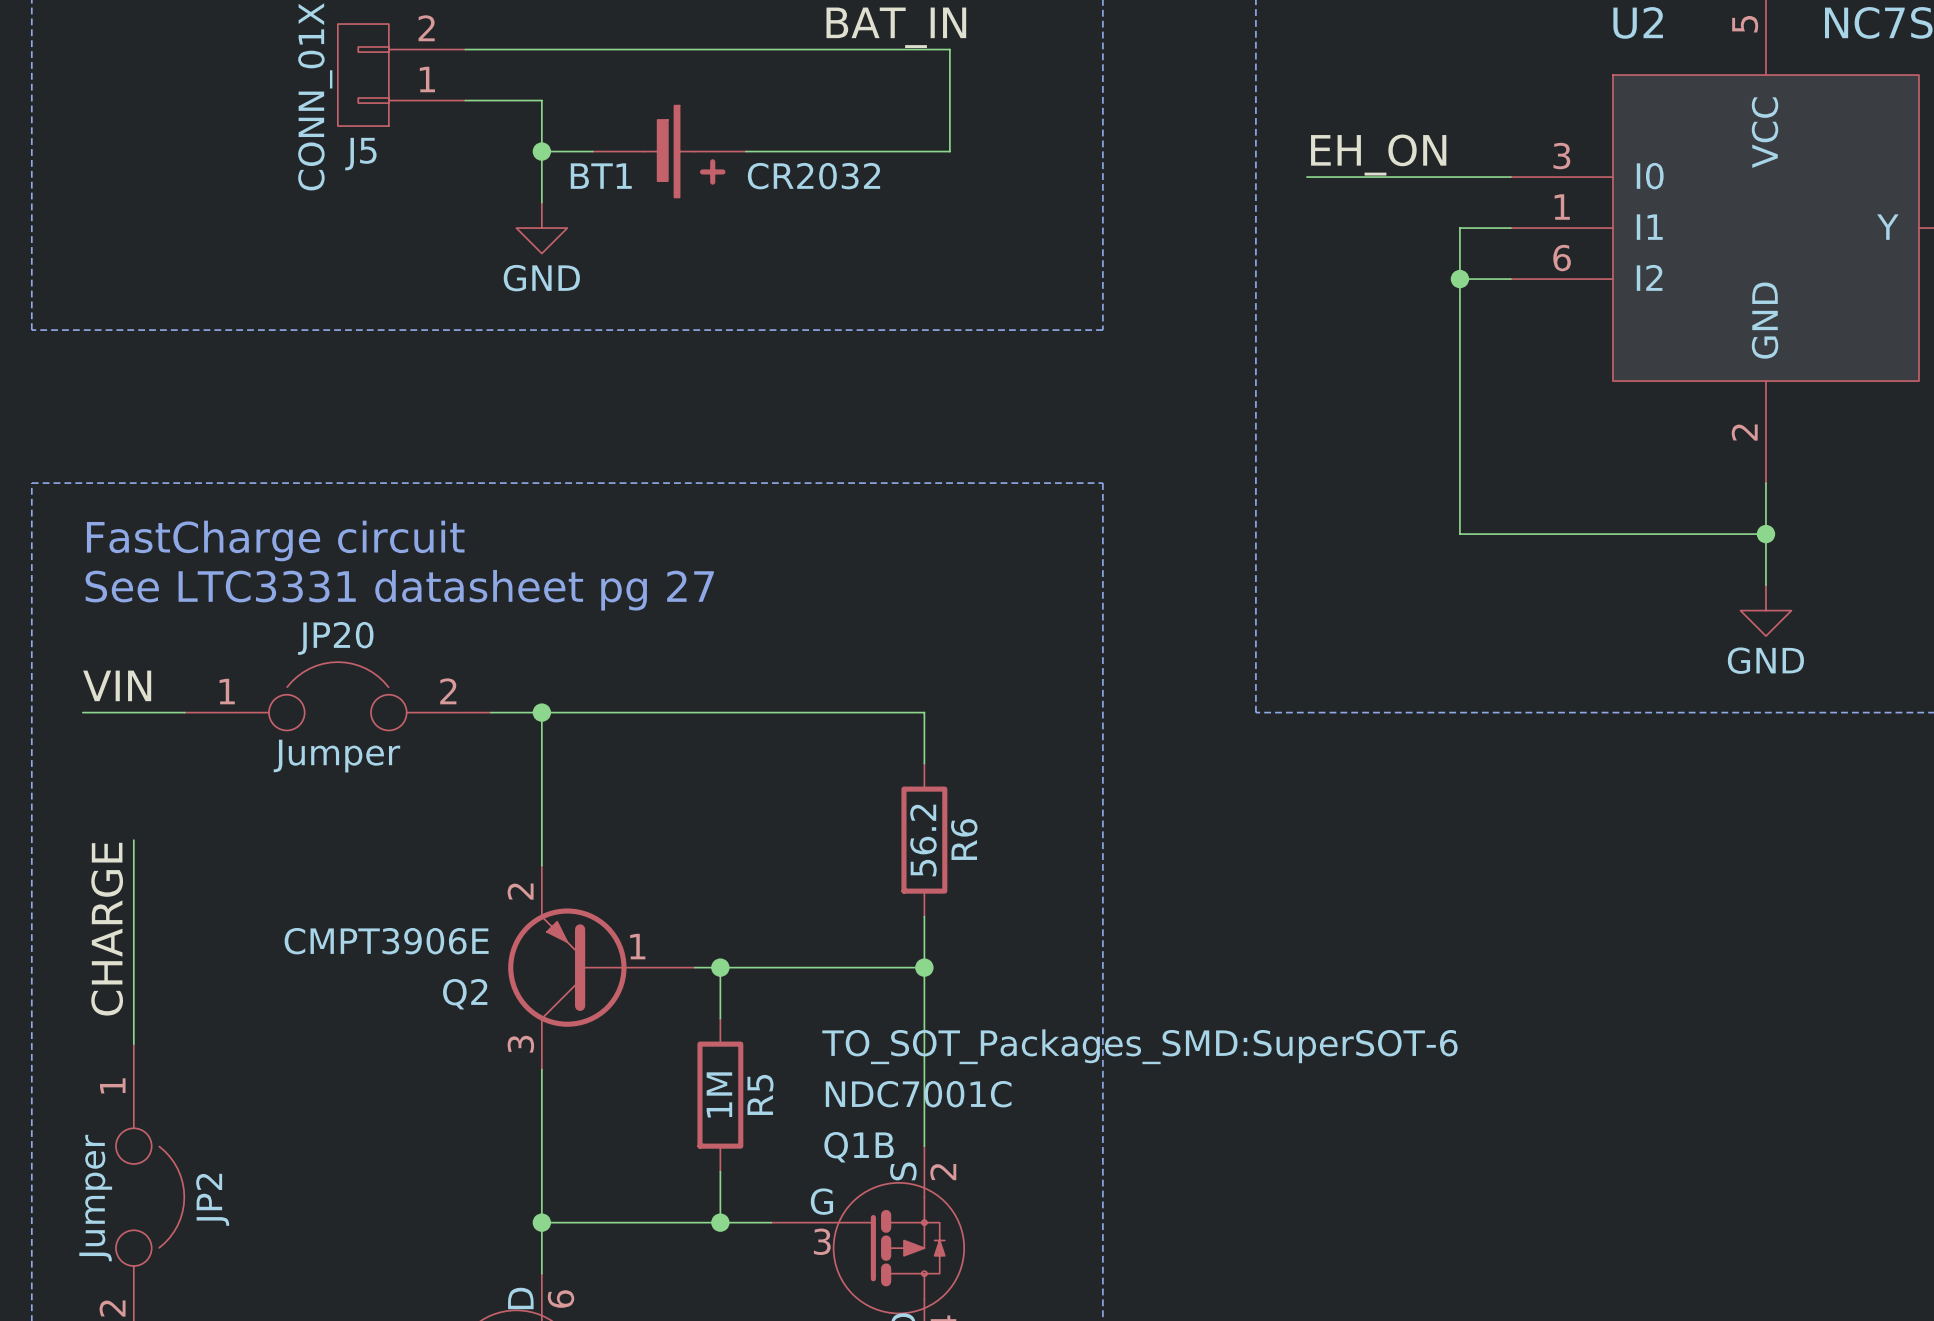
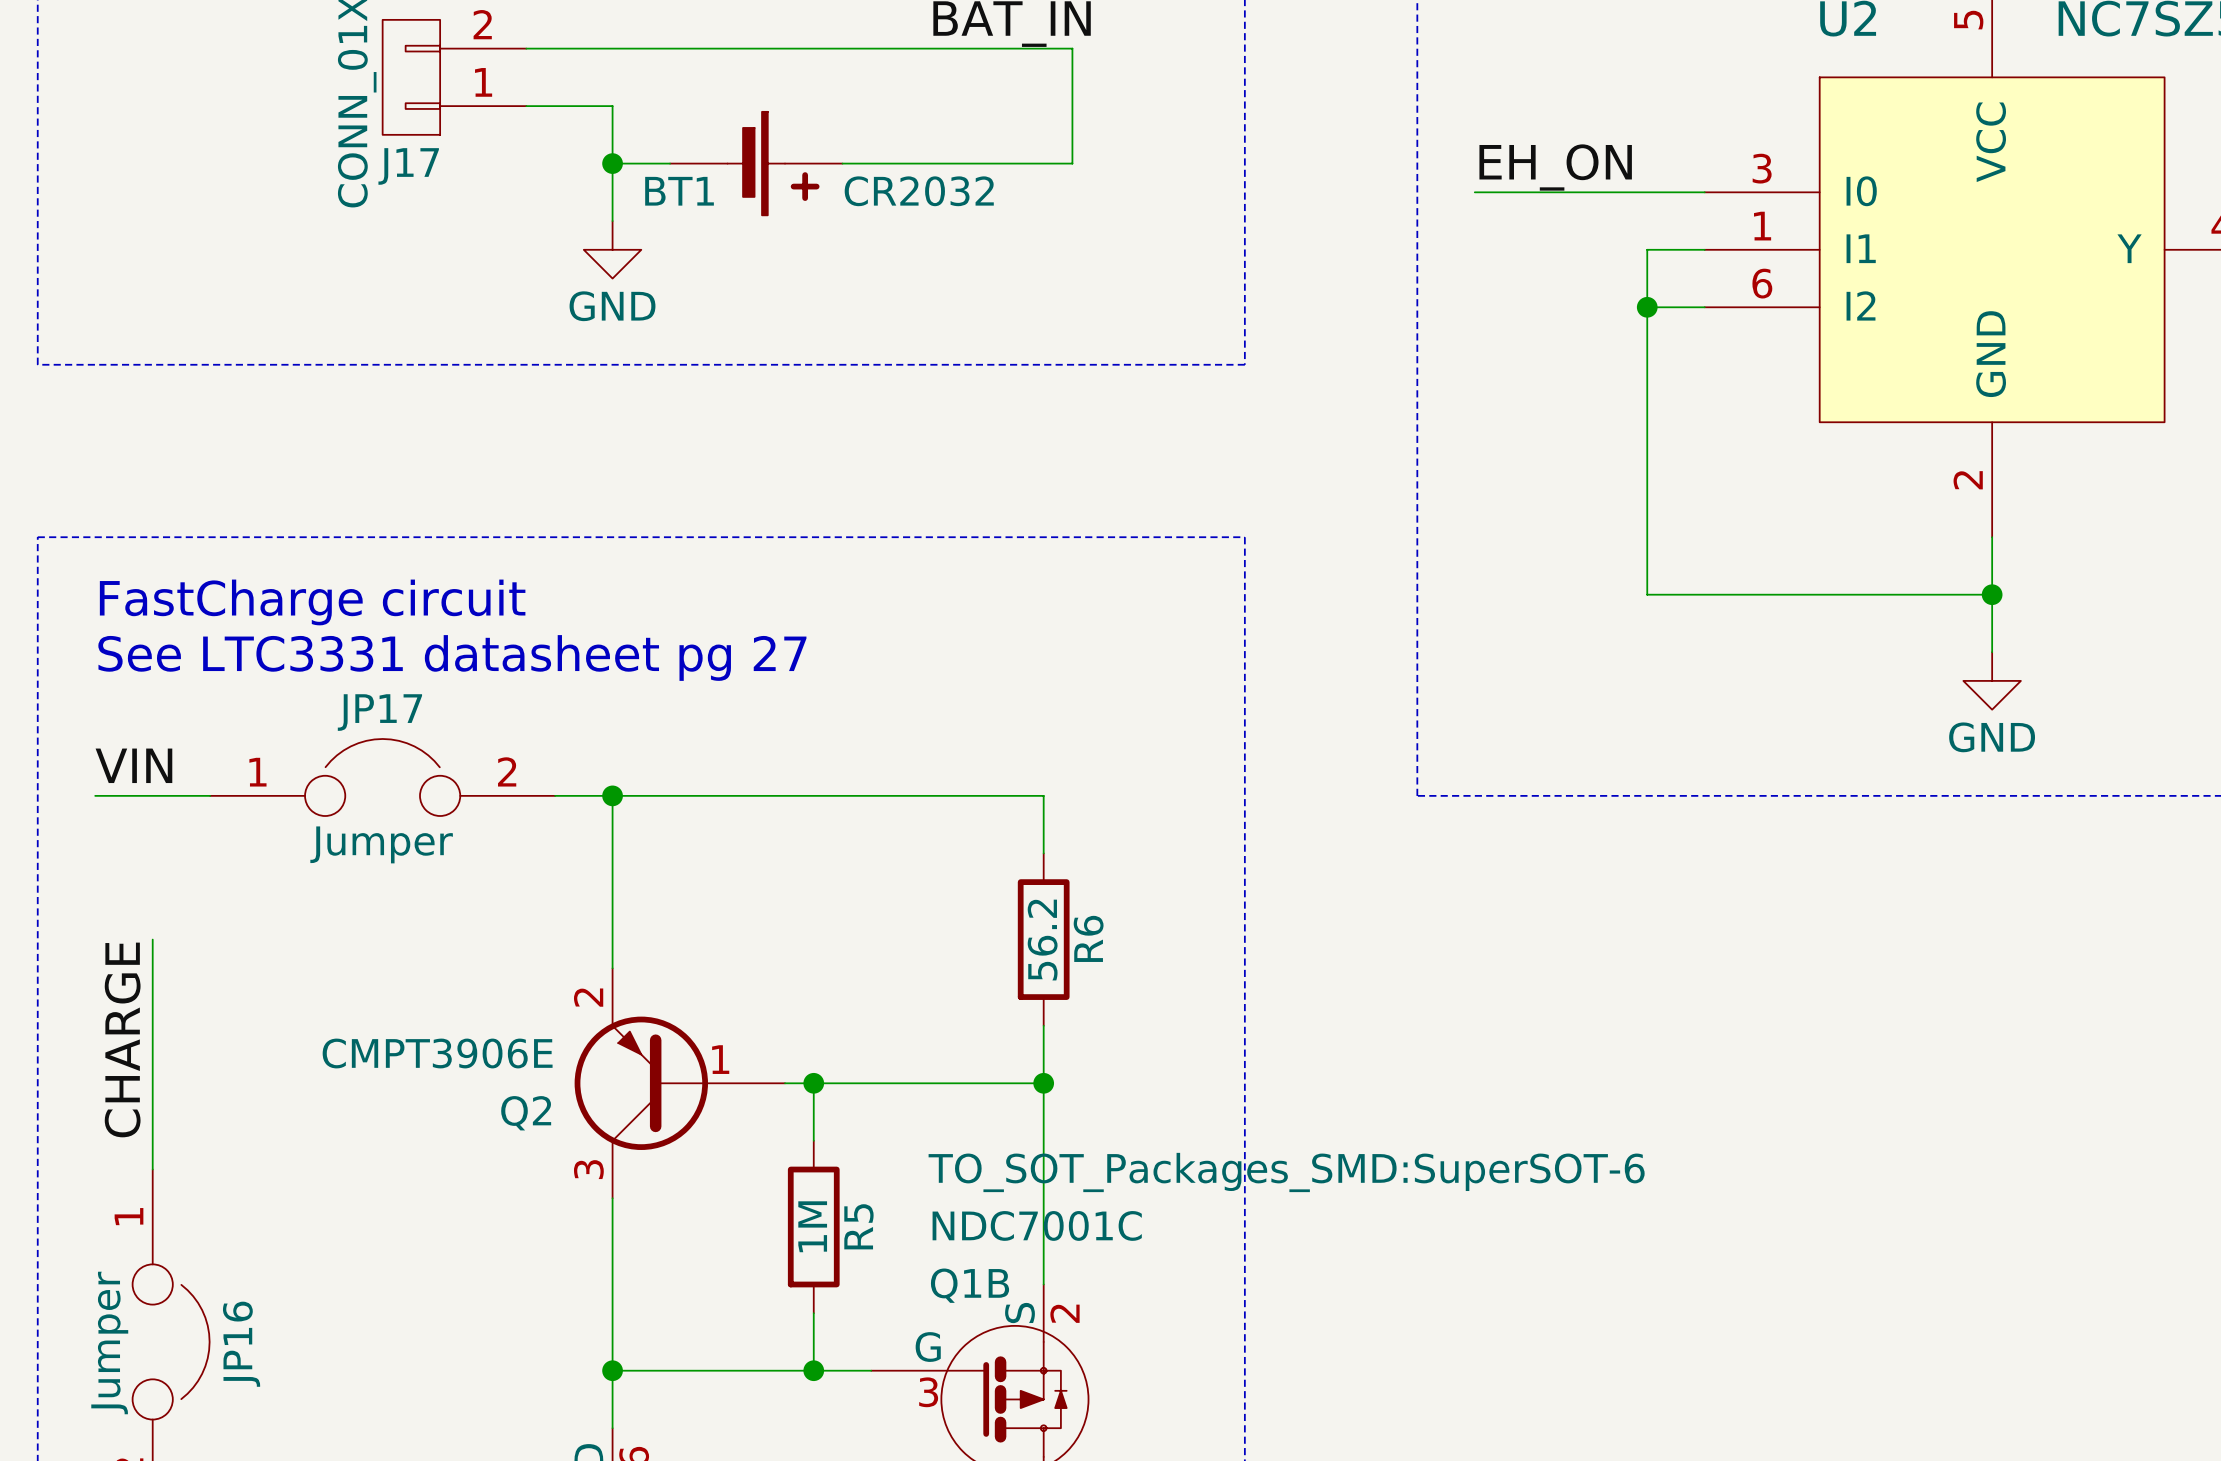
J5 name: J5 (360, 154) -> J17 (408, 166)
JP20 name: JP20 (335, 638) -> JP17 (379, 712)
JP2 name: JP2 (212, 1199) -> JP16 (241, 1344)

